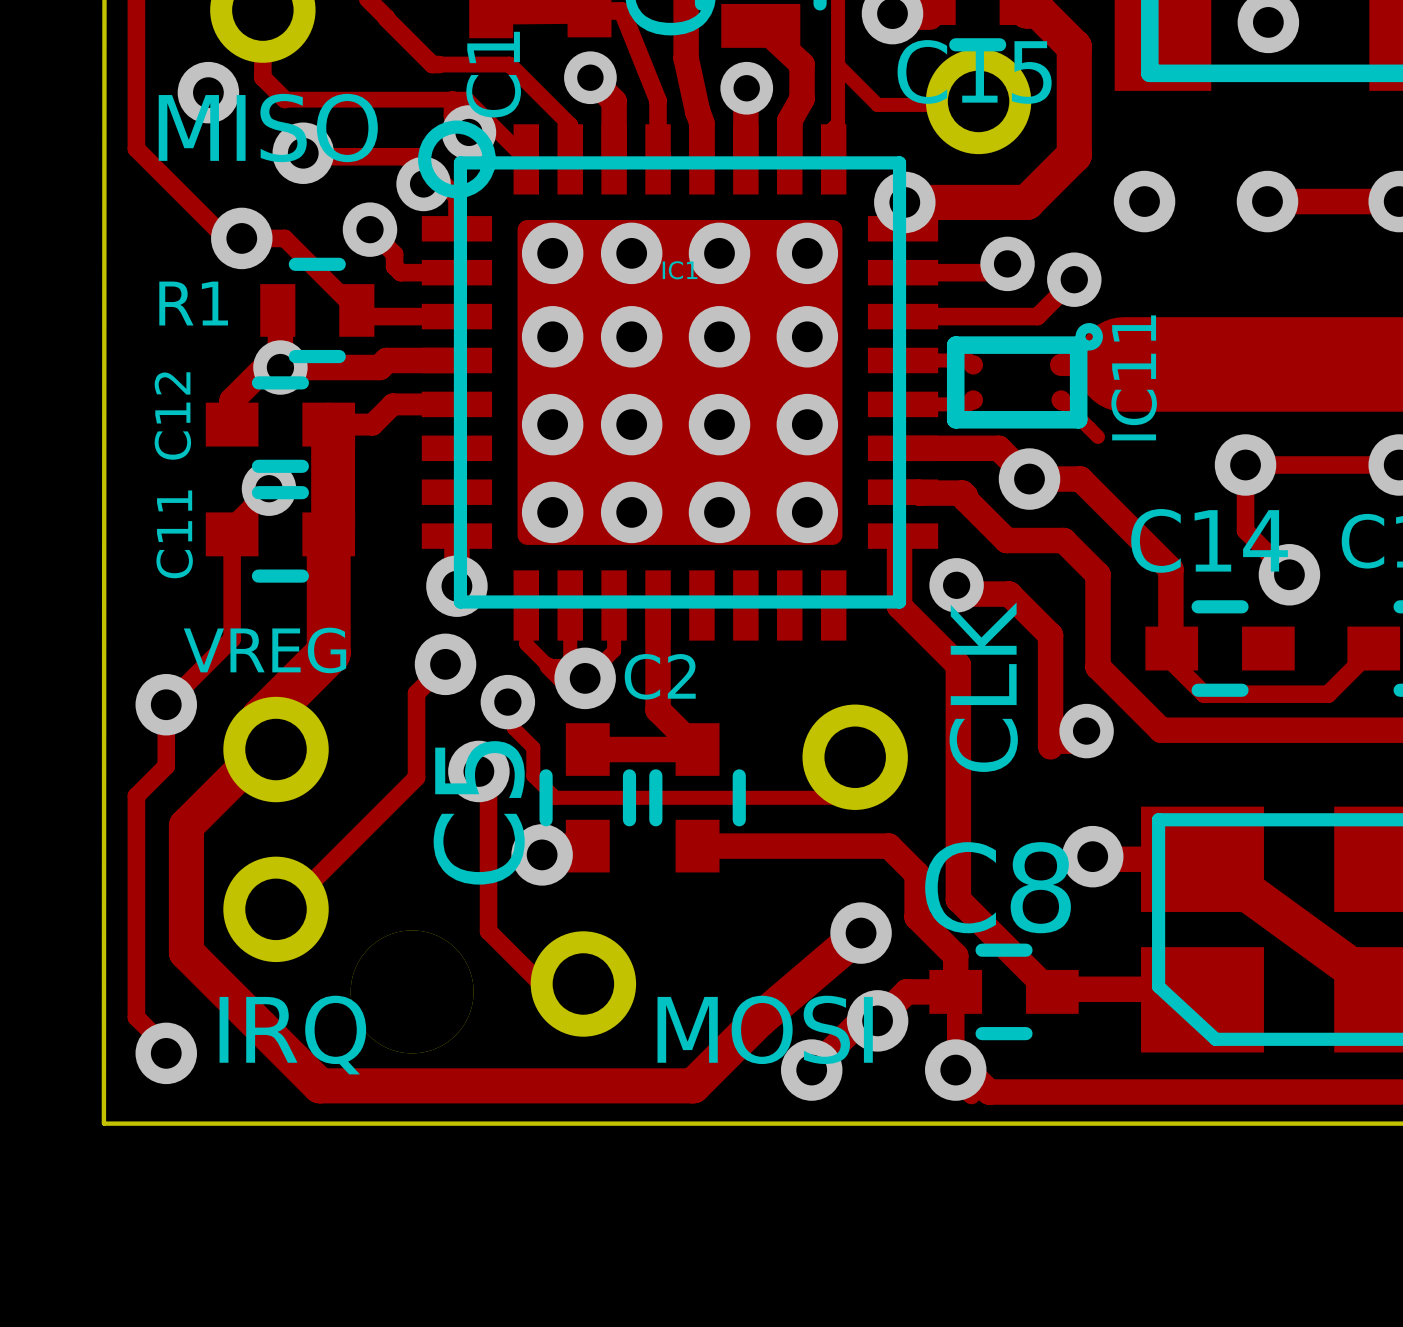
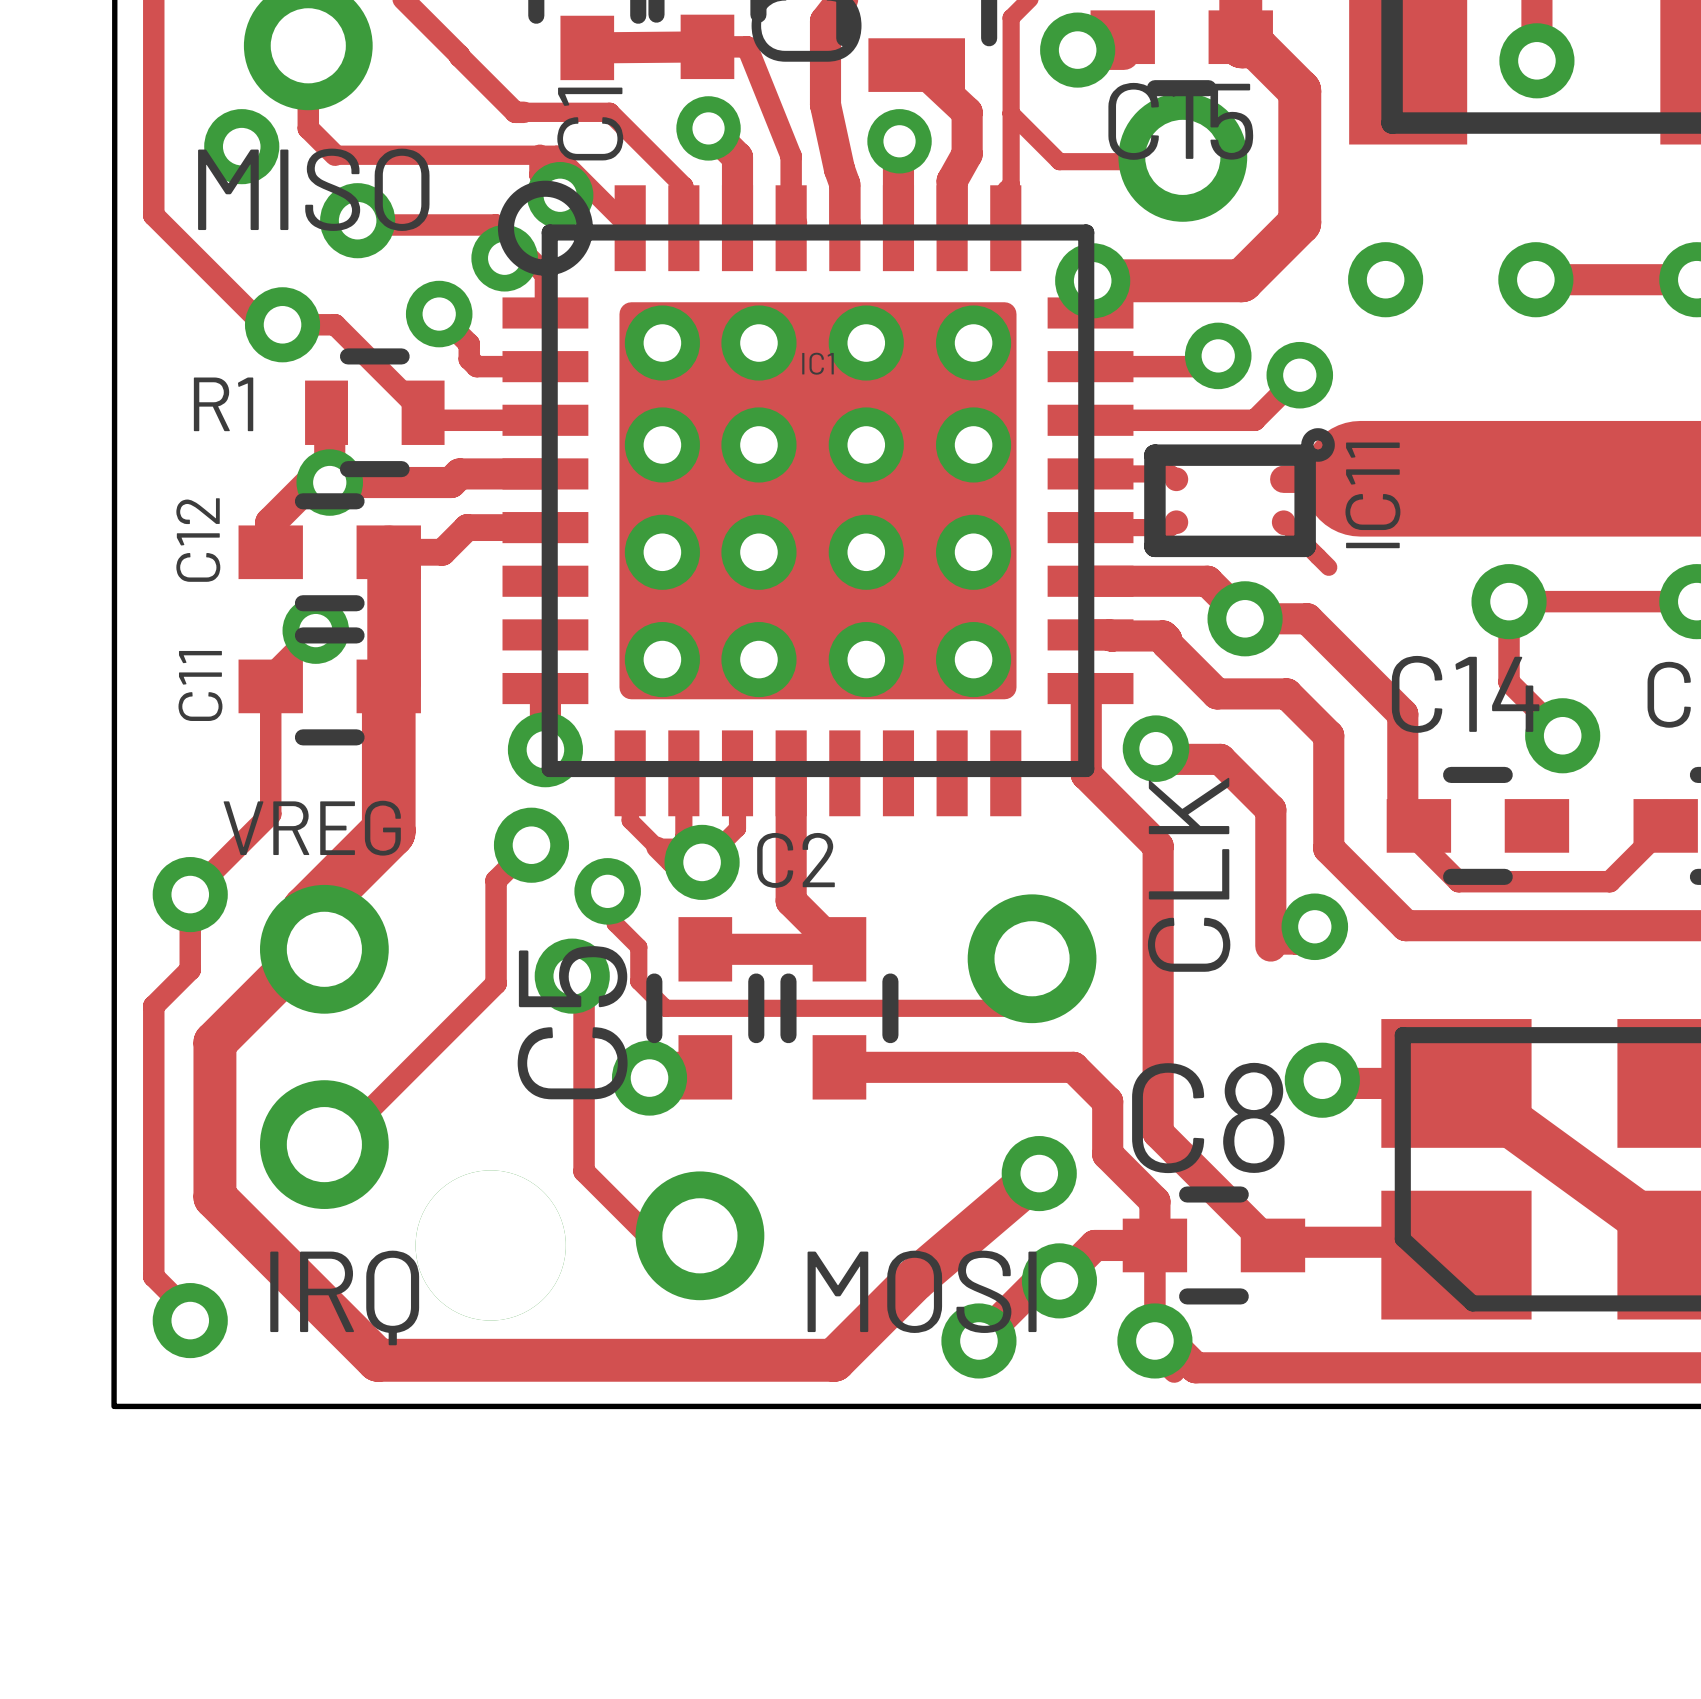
track: (1158, 557) (1170, 569) (1170, 647) -> (1402, 714) (1402, 809) (1417, 824)

